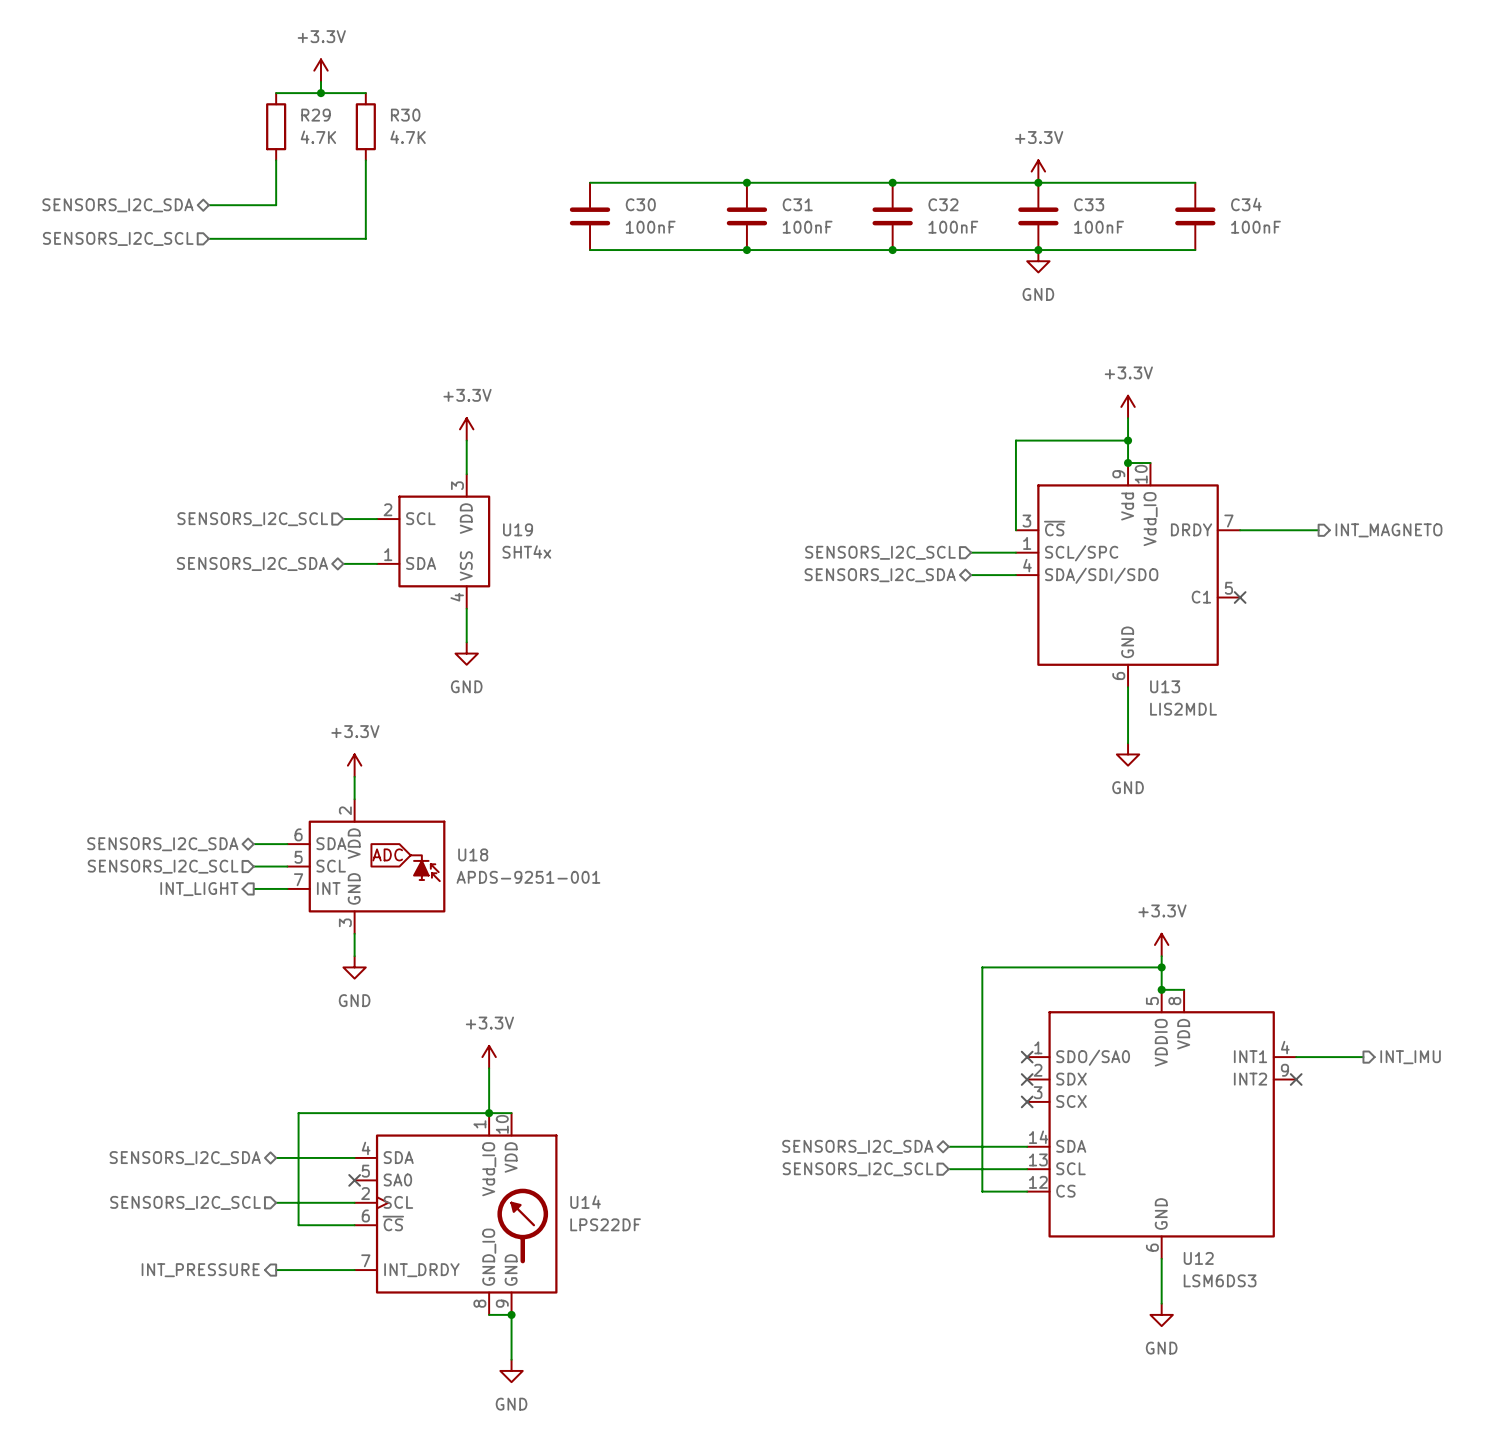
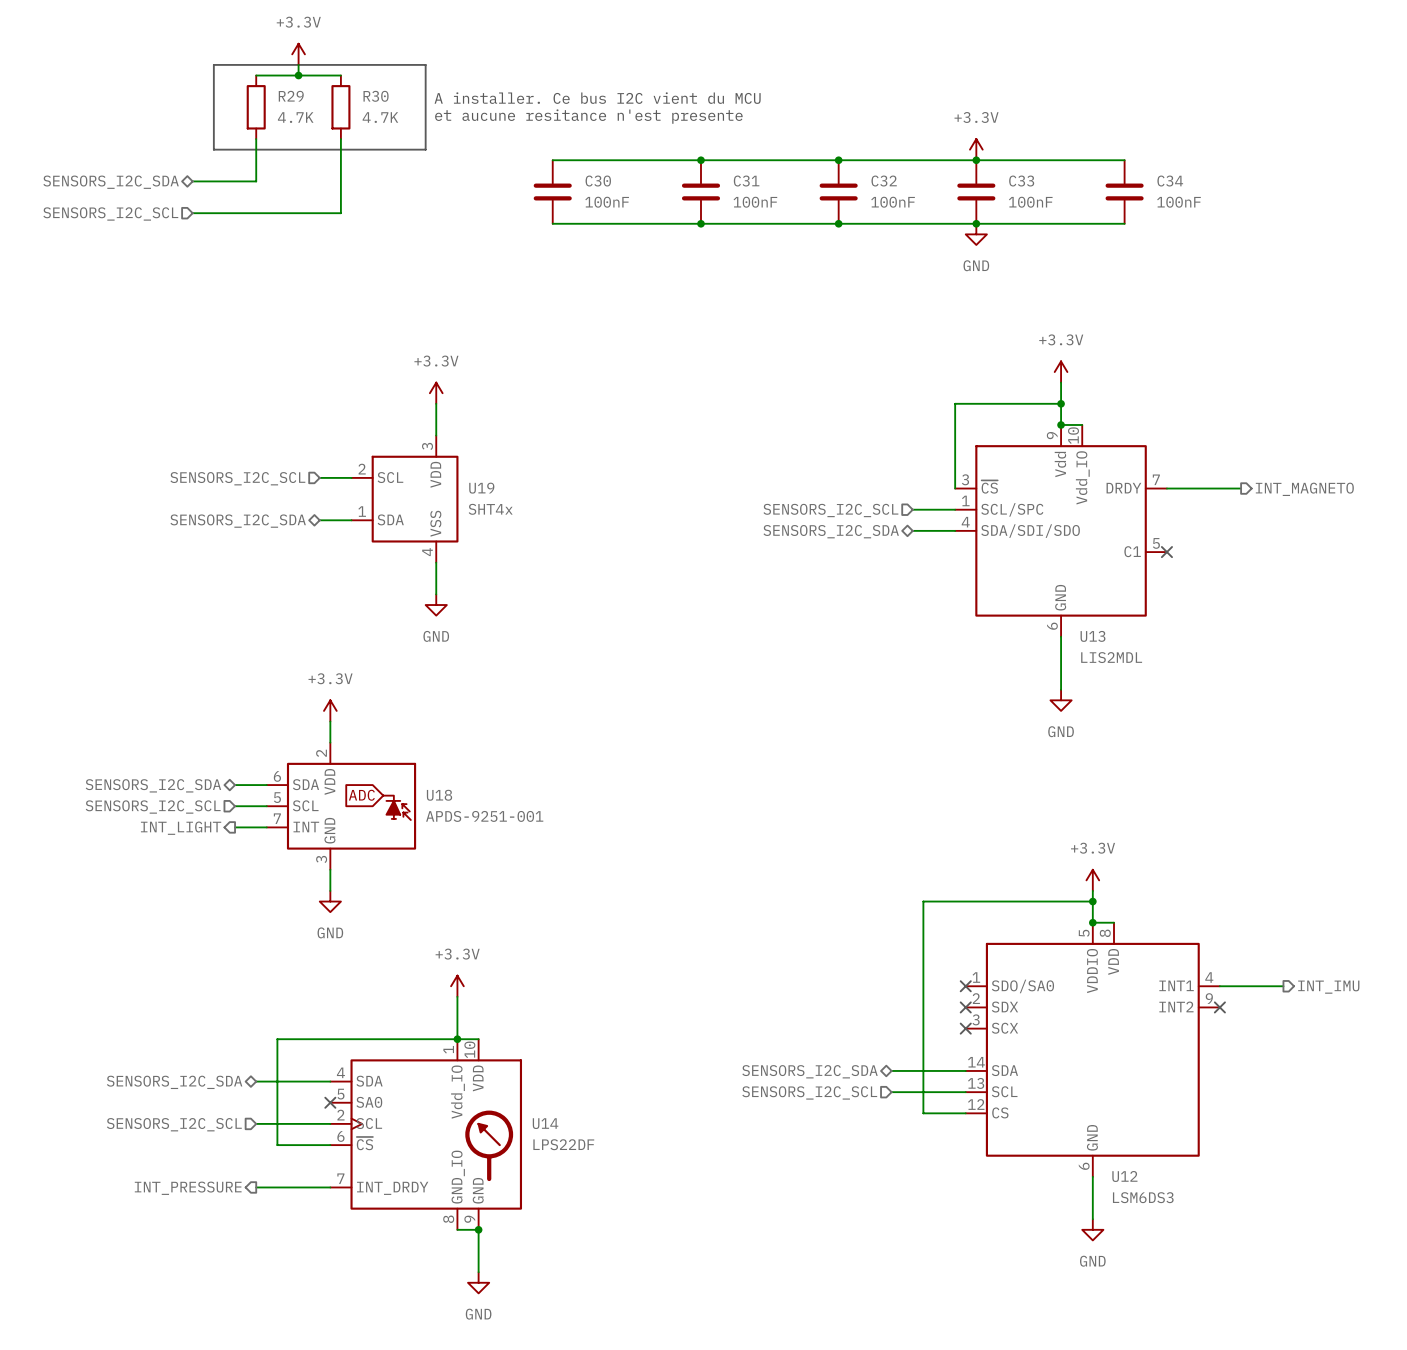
line: none -> (213, 64) (425, 64) (425, 149) (213, 149) (213, 64)
text: none -> A installer. Ce bus I2C vient du MCU (597, 98)
text: none -> et aucune resitance n'est presente (588, 116)

